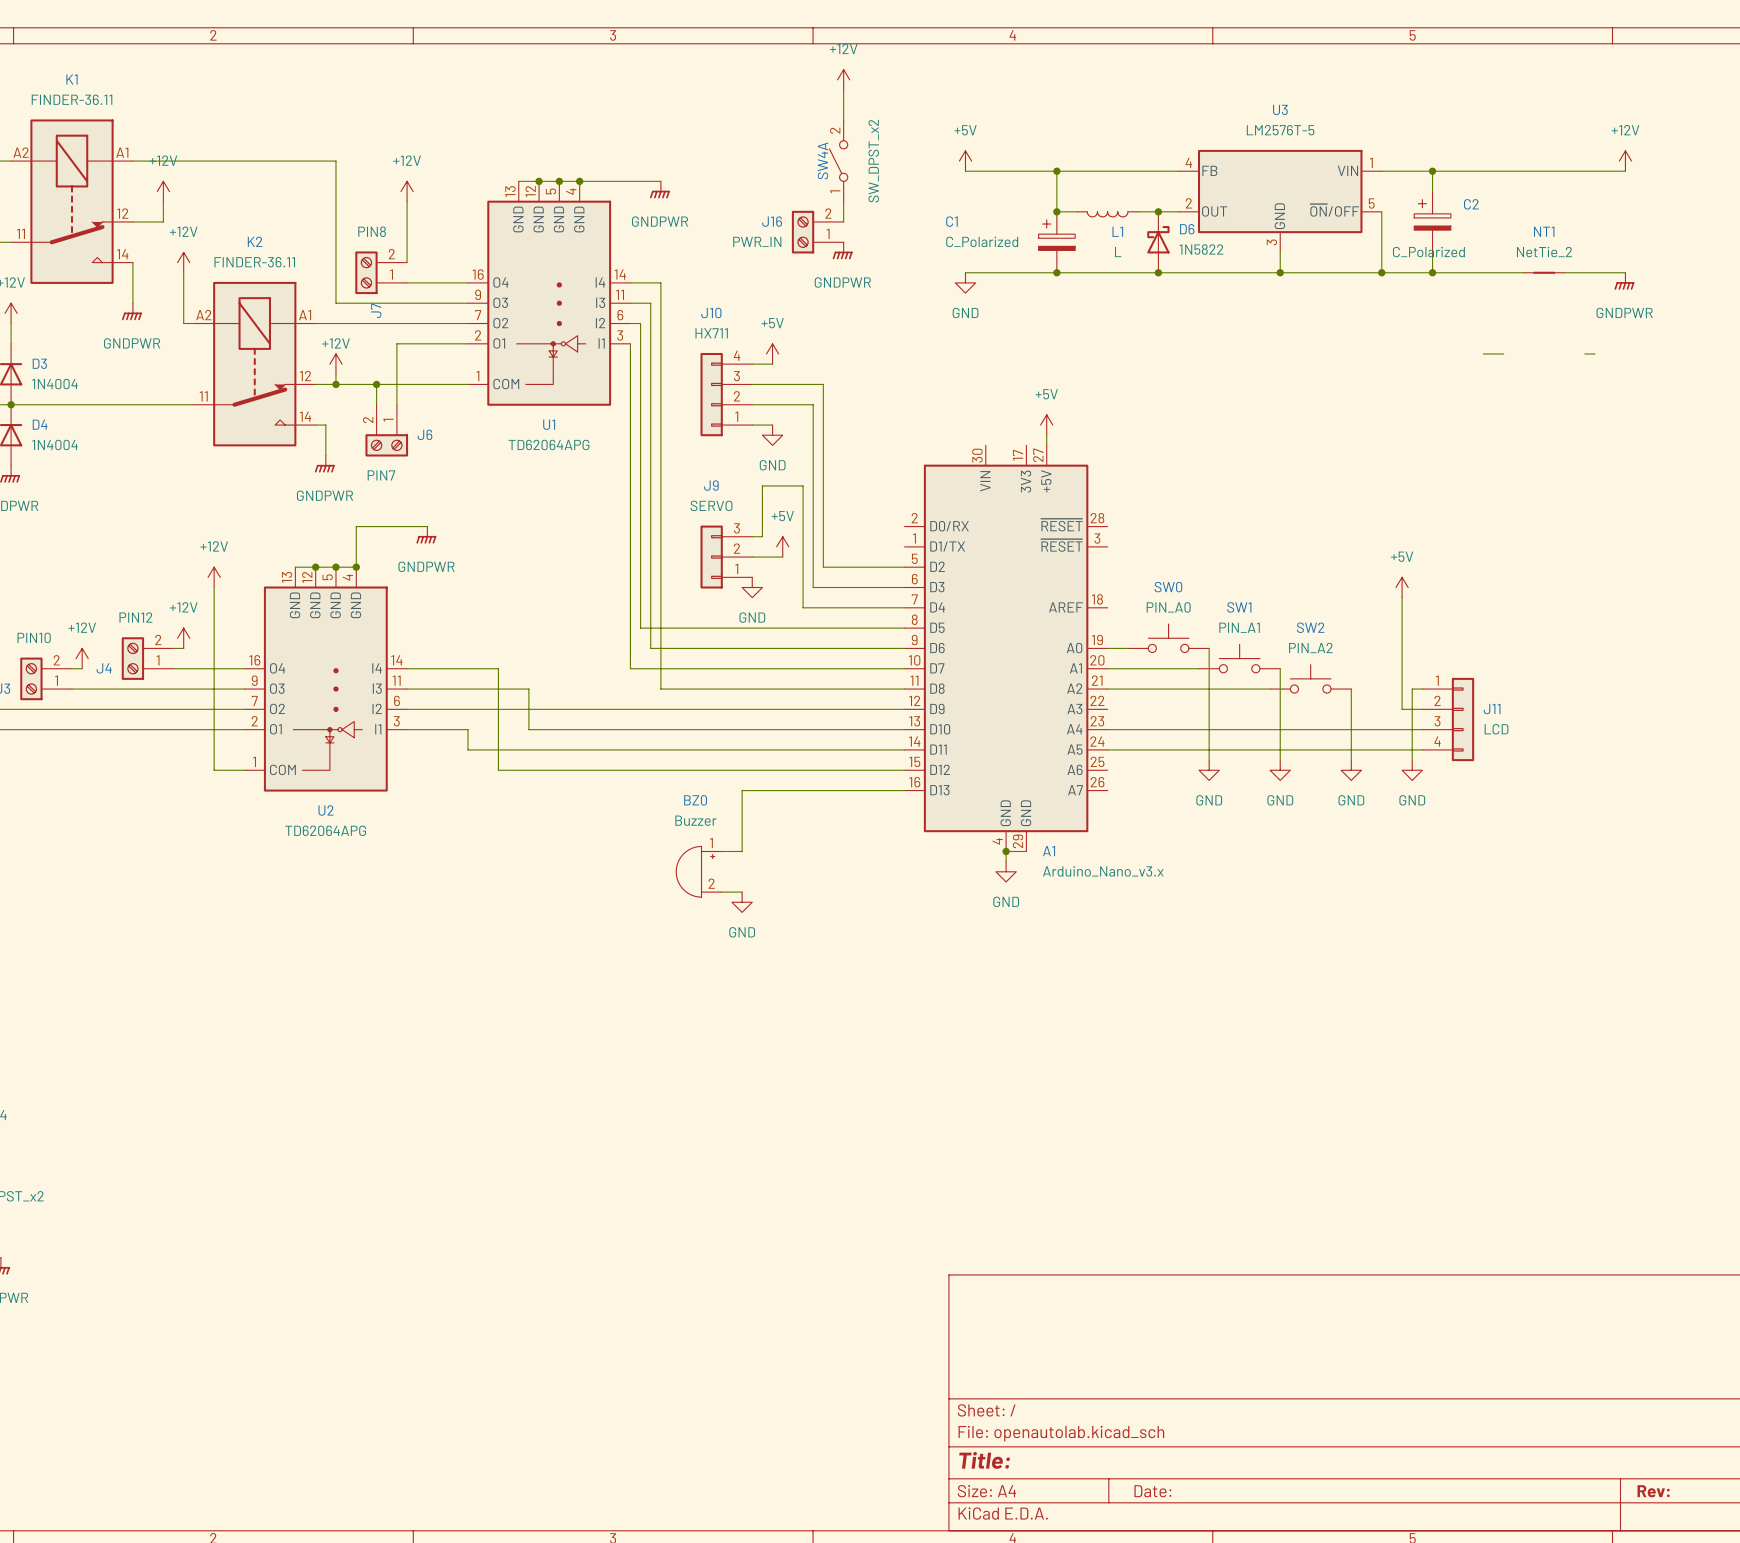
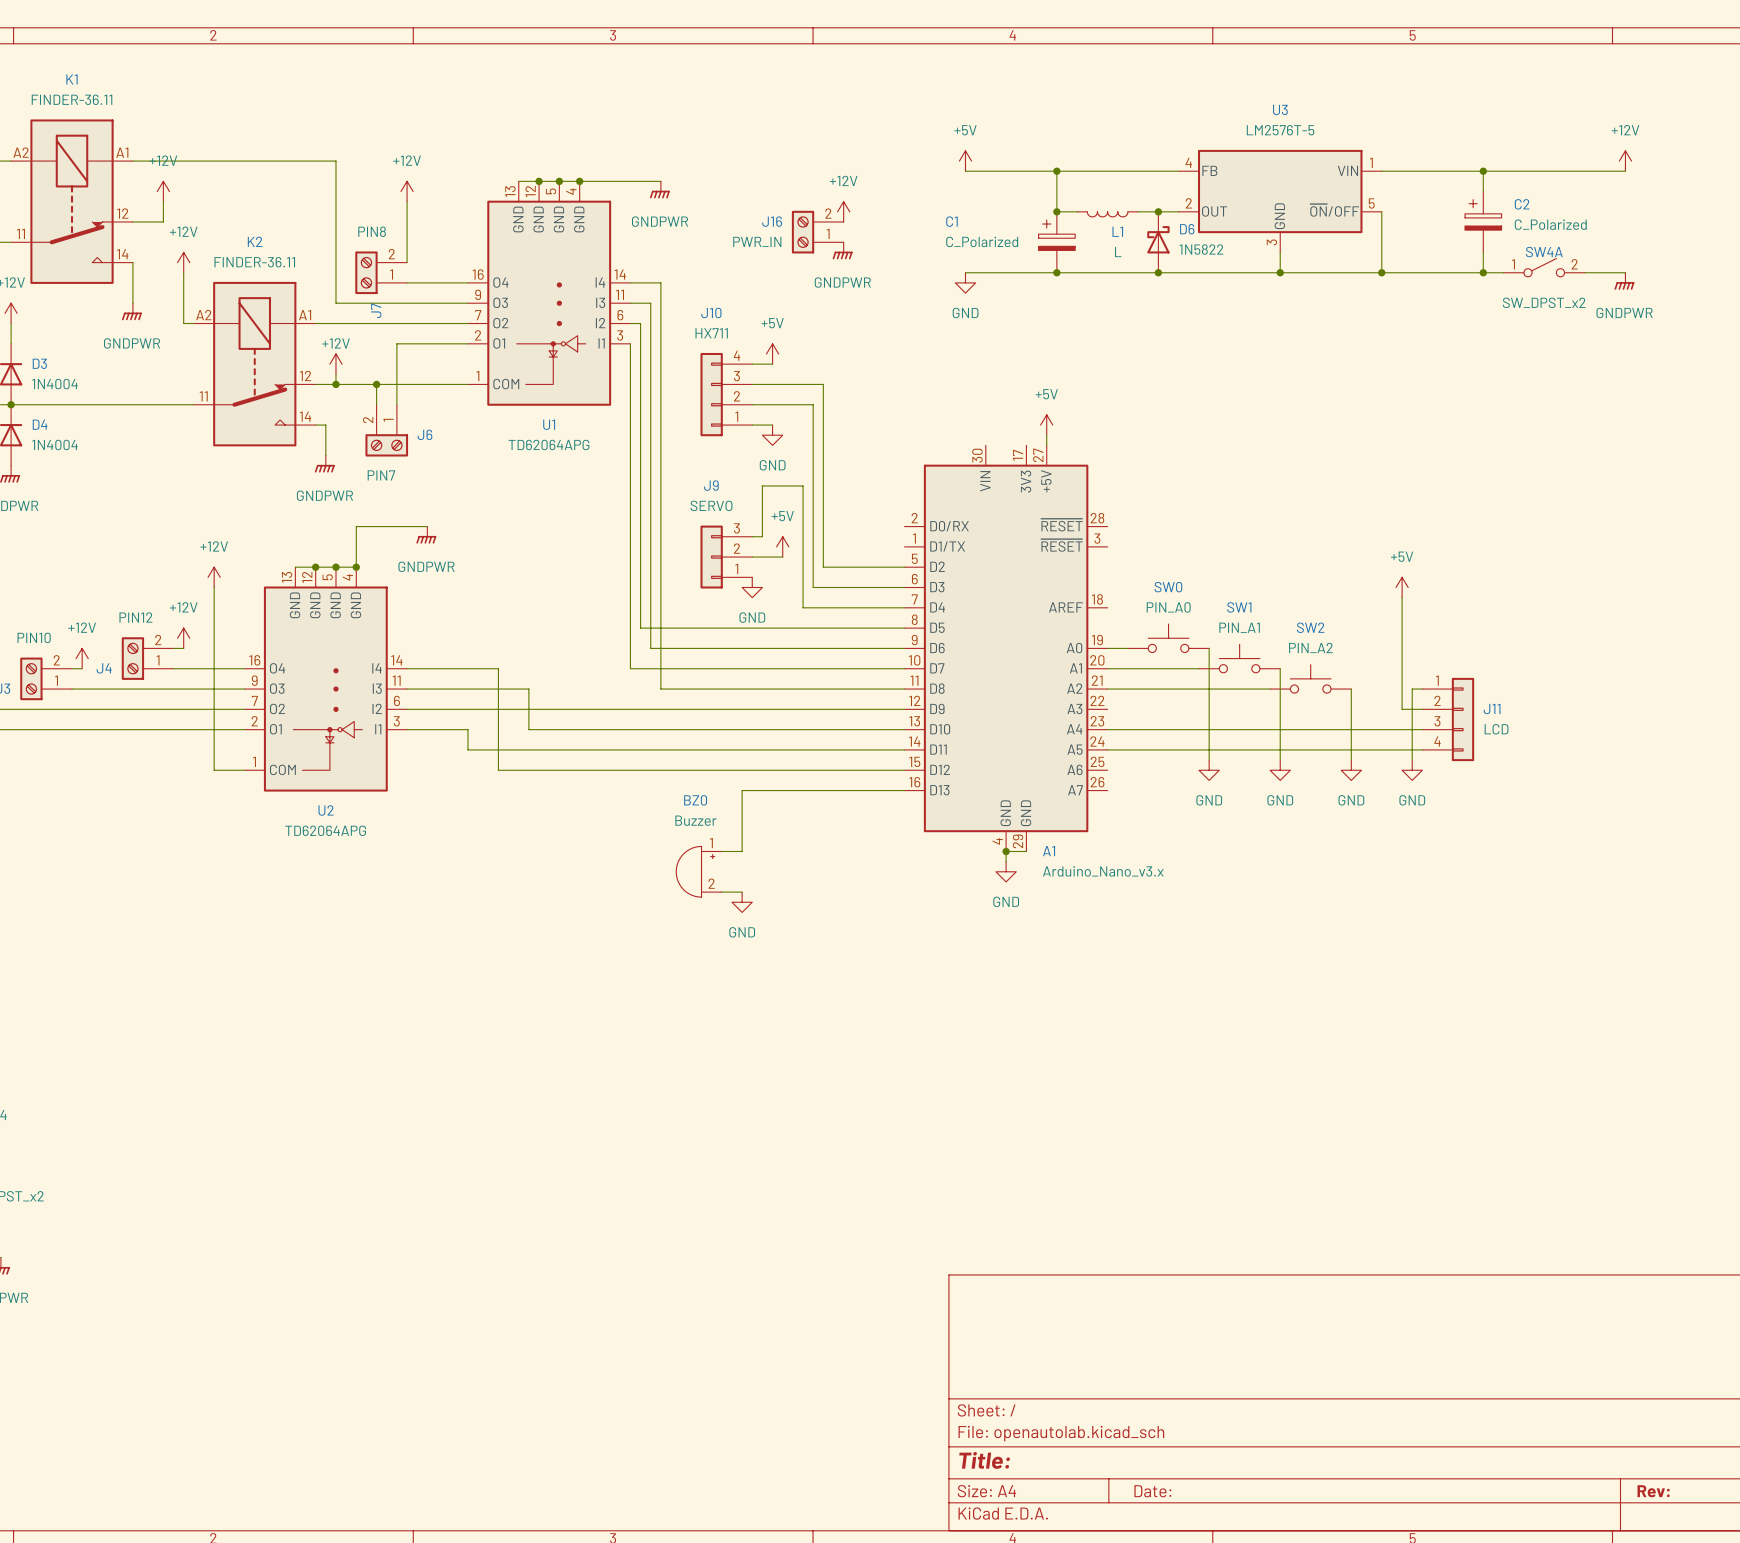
power symbol position: +12V (843, 79) -> +12V (843, 211)
wire: (843, 89) (843, 120) -> none
SW4A rotation: 0° (838, 161) -> 90° clockwise (1544, 267)
SW4A position: (838, 161) -> (1544, 267)
wire: (1432, 171) (1432, 191) -> (1483, 171) (1483, 191)
junction: (1432, 171) -> none
junction: none -> (1483, 171)
C2 position: (1432, 221) -> (1483, 221)
C2 value position: C_Polarized (1428, 252) -> C_Polarized (1550, 224)
wire: (1432, 252) (1432, 272) -> (1483, 252) (1483, 272)
junction: (1432, 272) -> none
junction: none -> (1483, 272)
NT1: NetTie_2 (1544, 272) -> none
wire: (1483, 353) (1503, 353) -> none
wire: (1584, 353) (1594, 353) -> none

